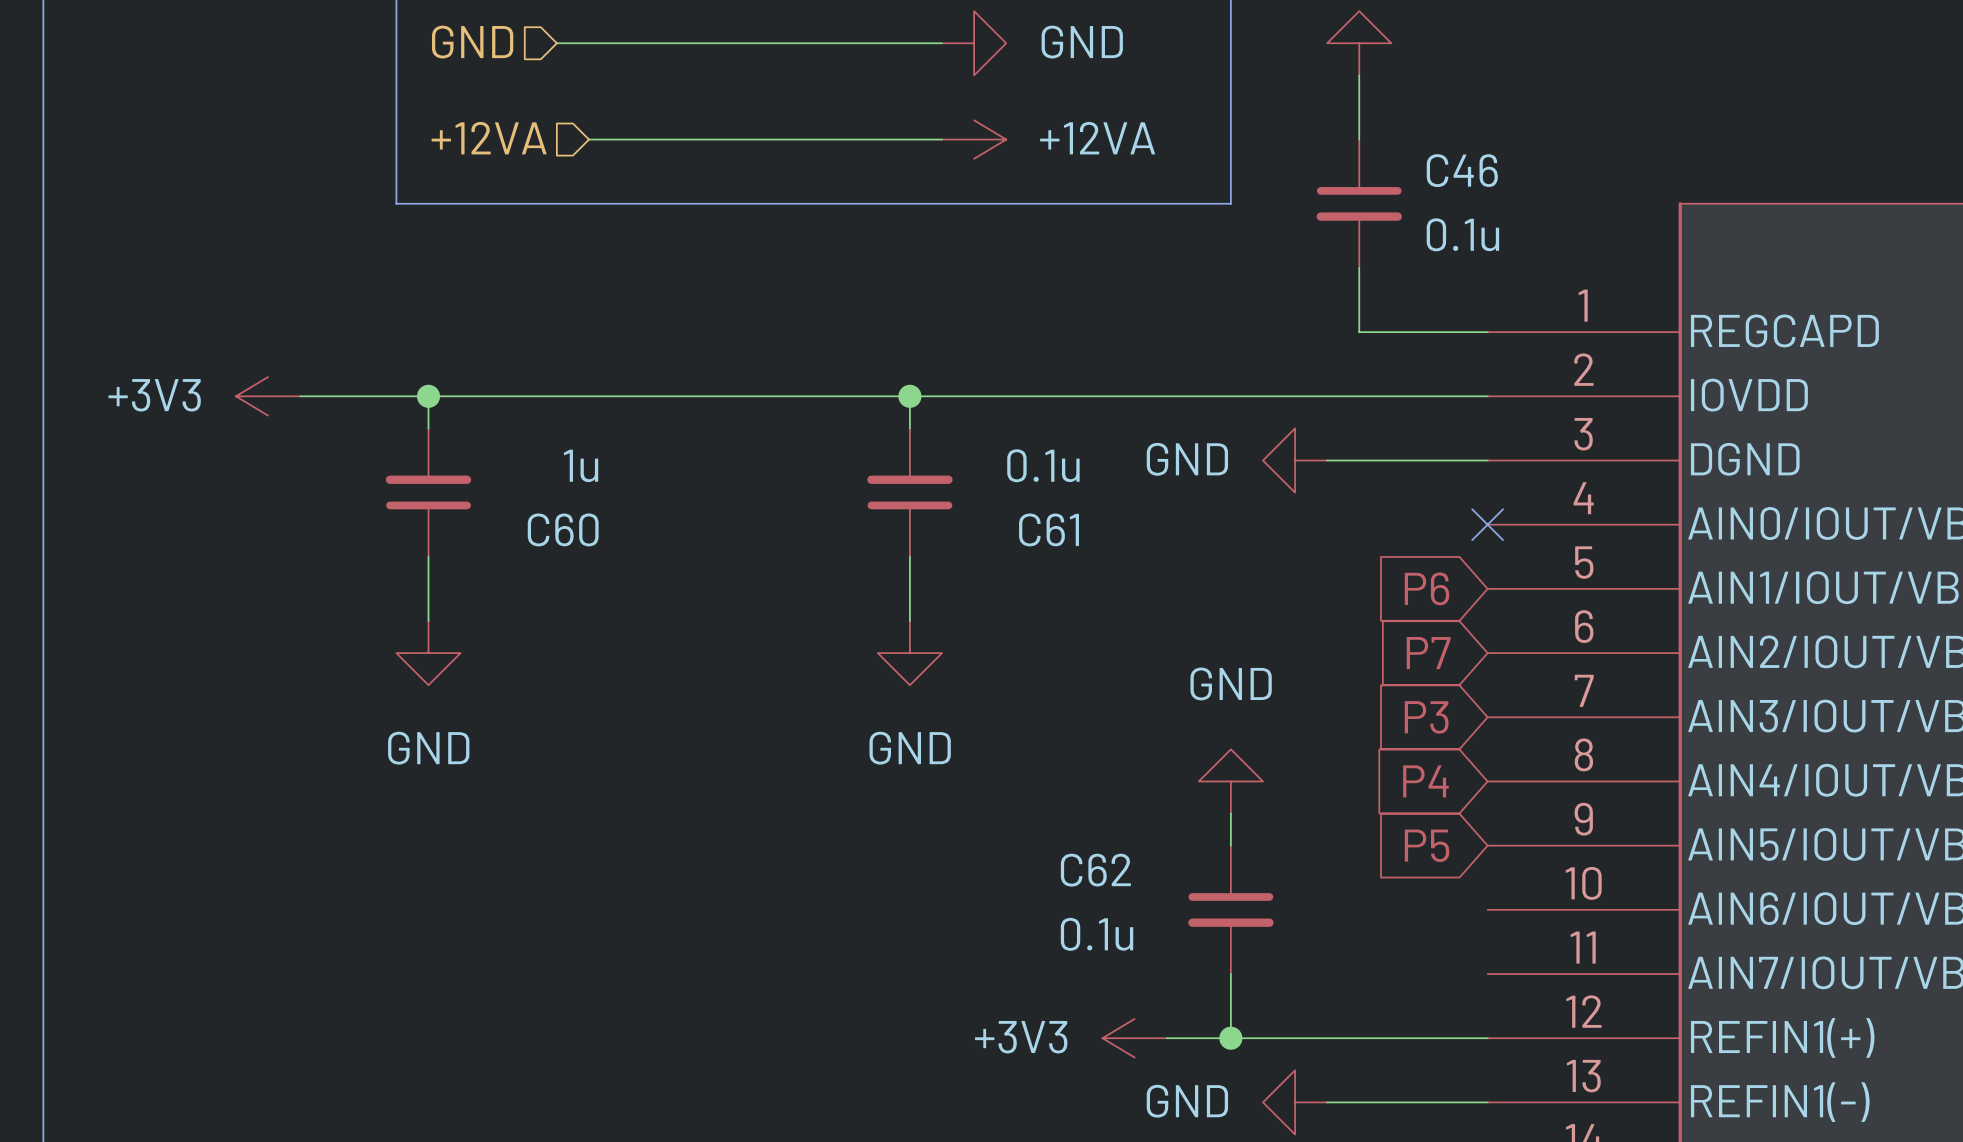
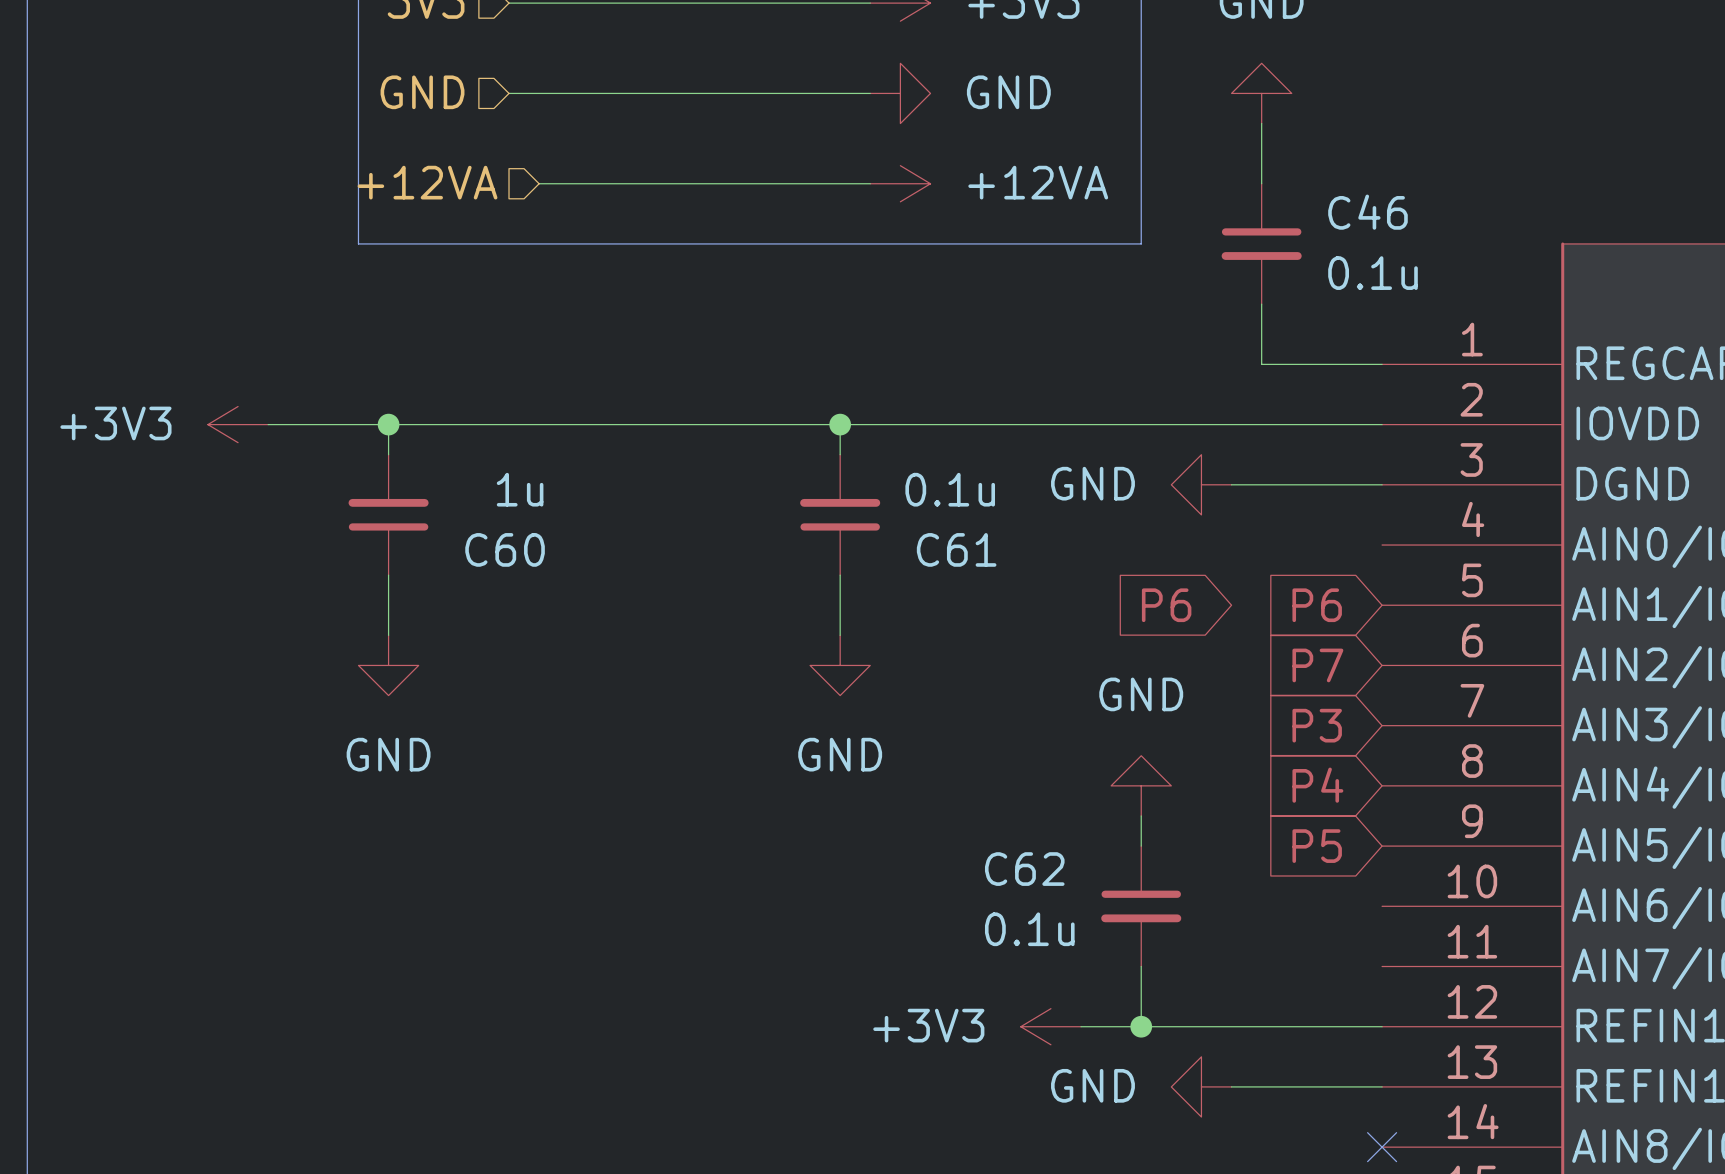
no-connect mark: (1487, 524) -> none
global label: none -> P6 (1166, 605)

